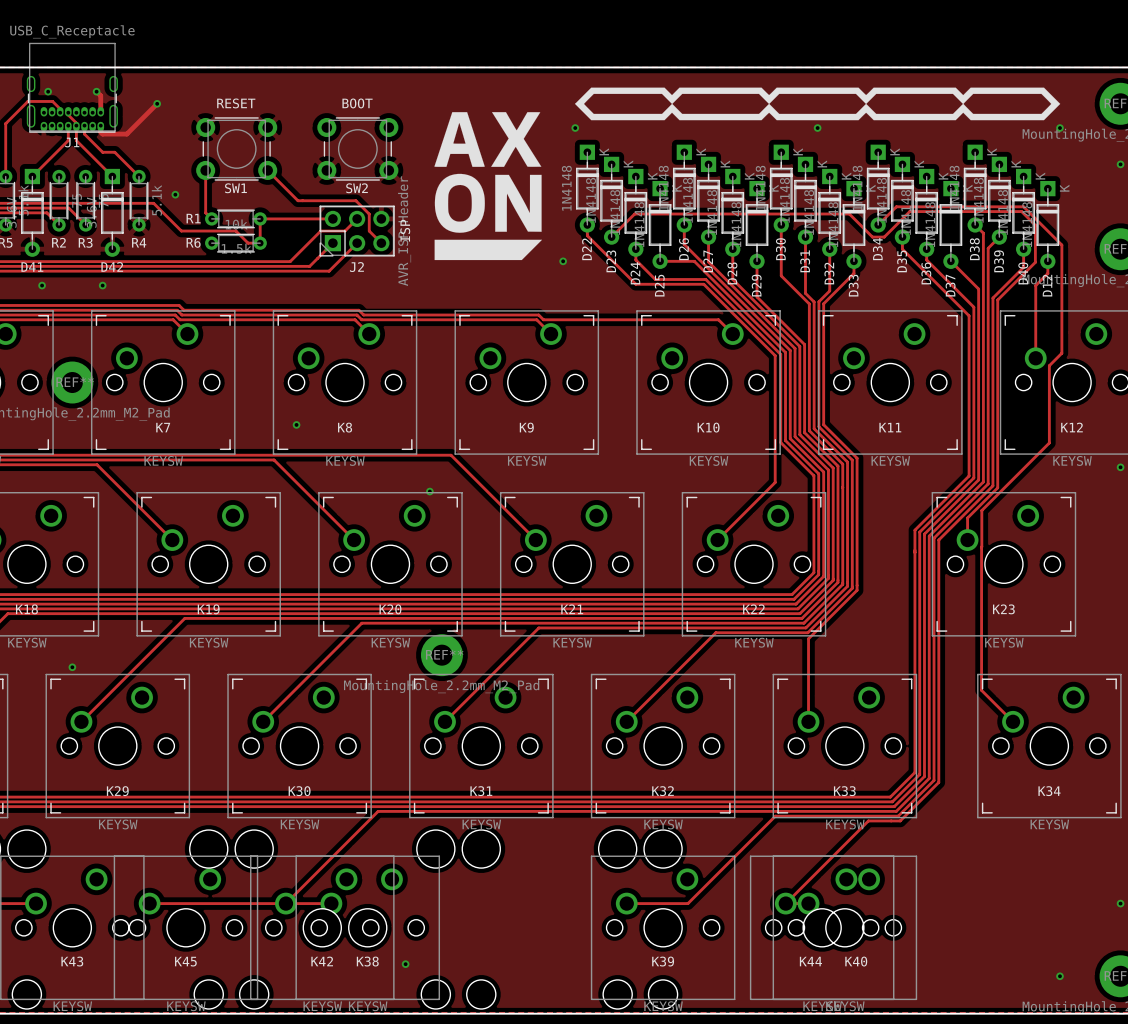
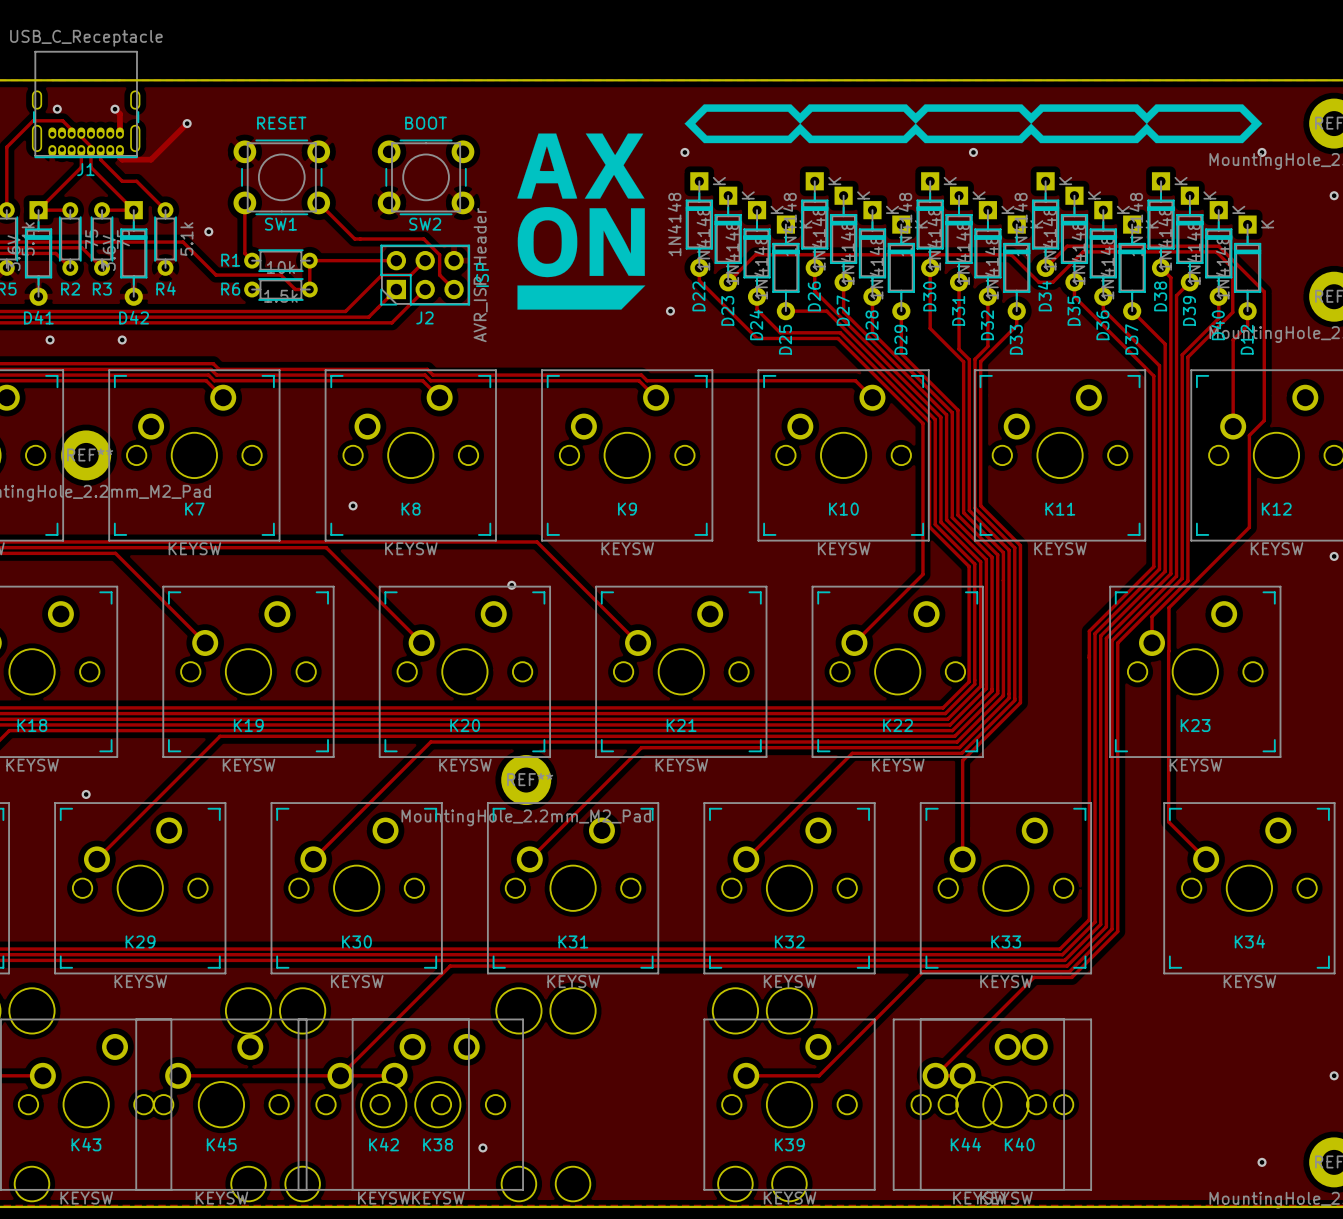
track: none -> (38, 210) (70, 210)
track: none -> (102, 210) (133, 210)

